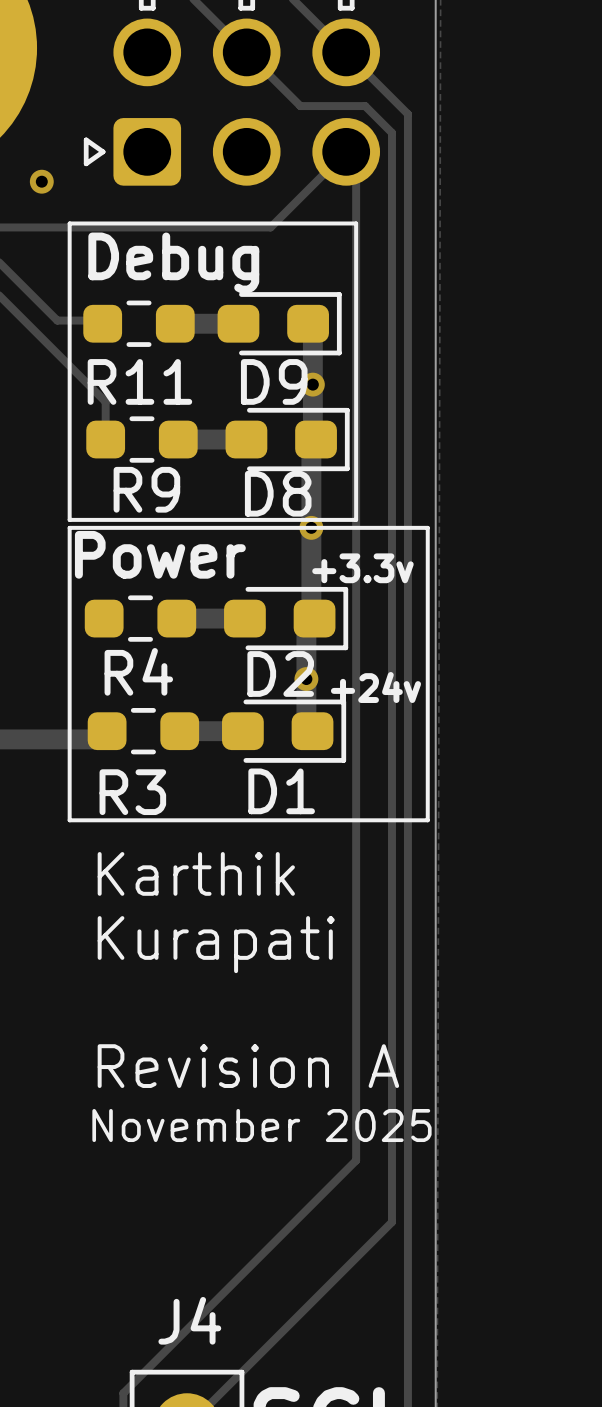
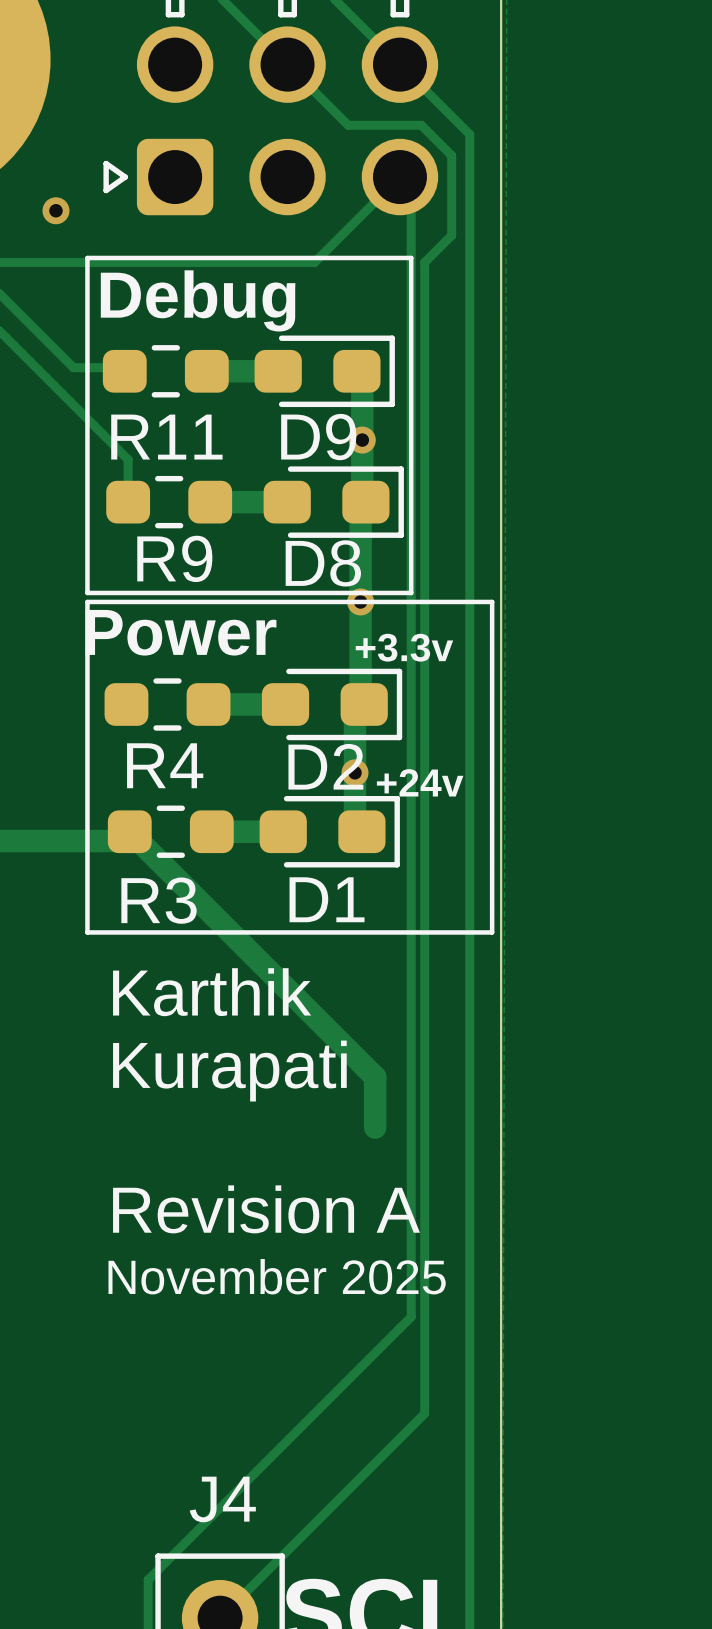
track: (391, 203) (391, 1222) (368, 1246) -> (451, 235) (424, 262) (424, 1413)
track: none -> (129, 831) (375, 1077) (375, 1127)

